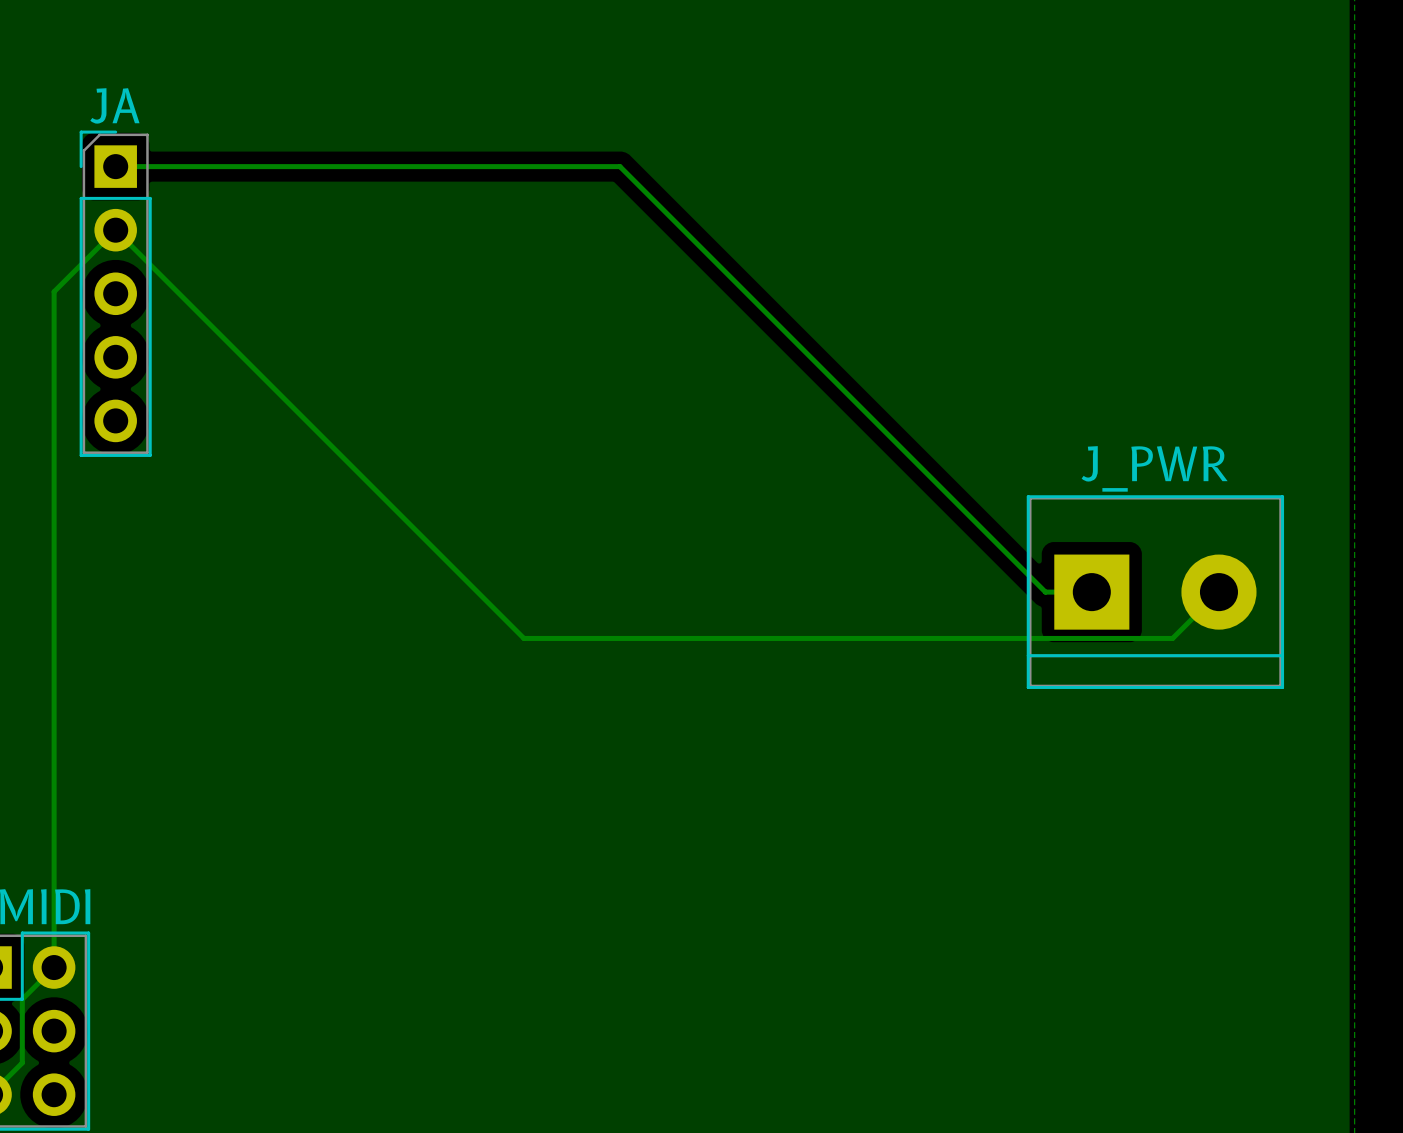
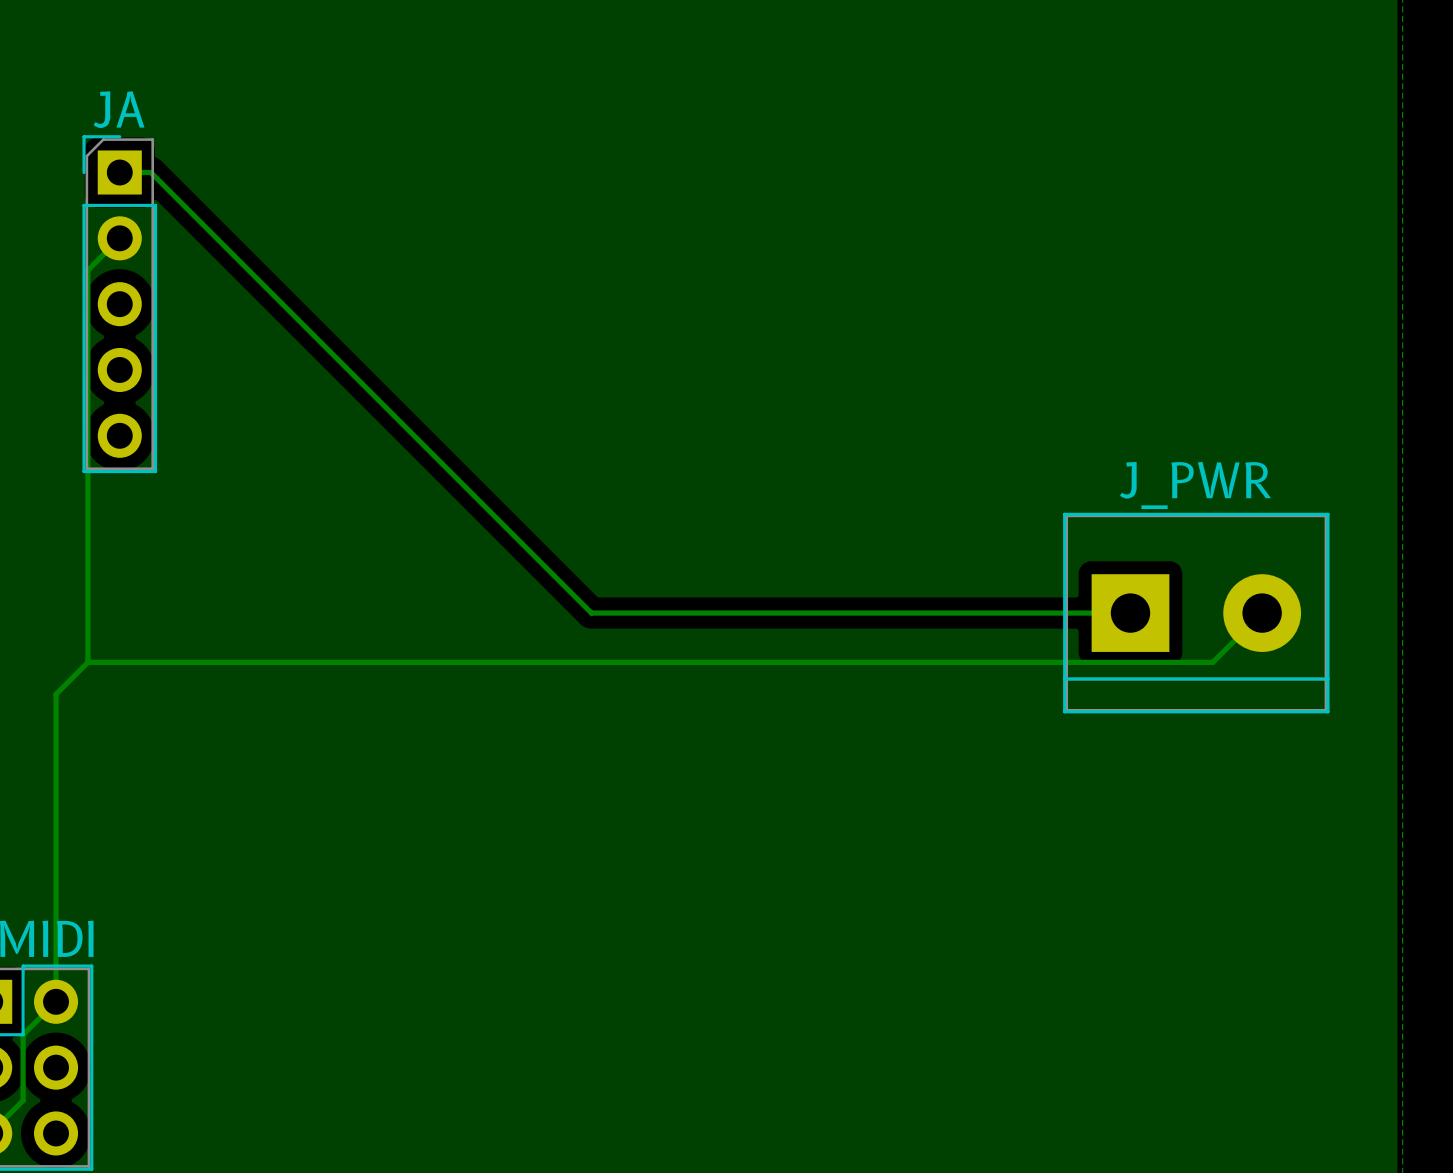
track: (145, 166) (619, 166) (1045, 592) -> (150, 172) (591, 613) (1082, 613)
track: (115, 230) (523, 638) (1172, 638) -> (87, 662) (1214, 661)
track: (84, 260) (54, 291) (54, 670) -> (87, 270) (87, 662)
track: none -> (87, 662) (56, 694)

